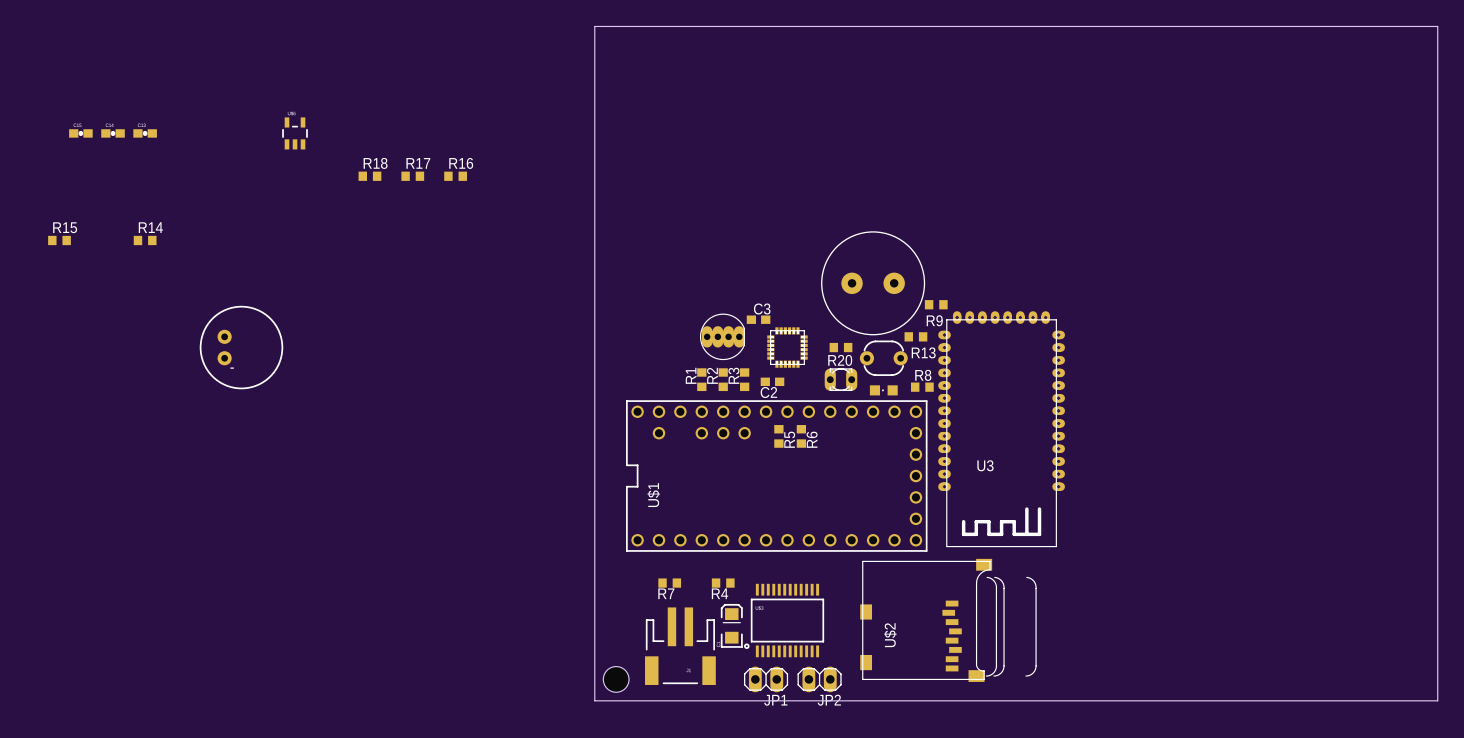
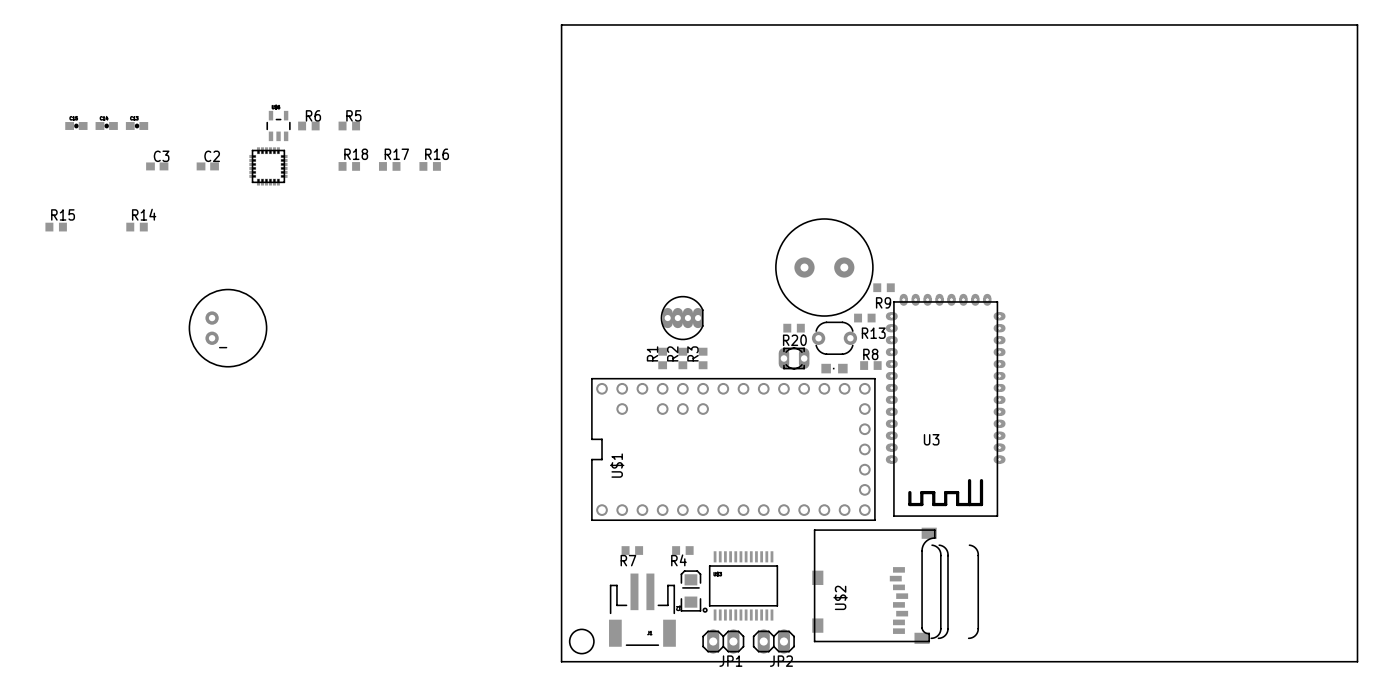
part: none -> (268, 166)
C3 position: (758, 319) -> (157, 166)
part: (787, 347) -> none
C2 position: (772, 381) -> (207, 166)
C2 name position: C2 (768, 392) -> C2 (212, 156)
R5 rotation: 0° (778, 436) -> 90° clockwise (349, 125)
R5 position: (778, 436) -> (349, 125)
R6 rotation: 0° (801, 436) -> 90° clockwise (308, 125)
R6 position: (801, 436) -> (308, 125)
R5 name position: R5 (789, 439) -> R5 (353, 115)
R6 name position: R6 (812, 439) -> R6 (313, 115)

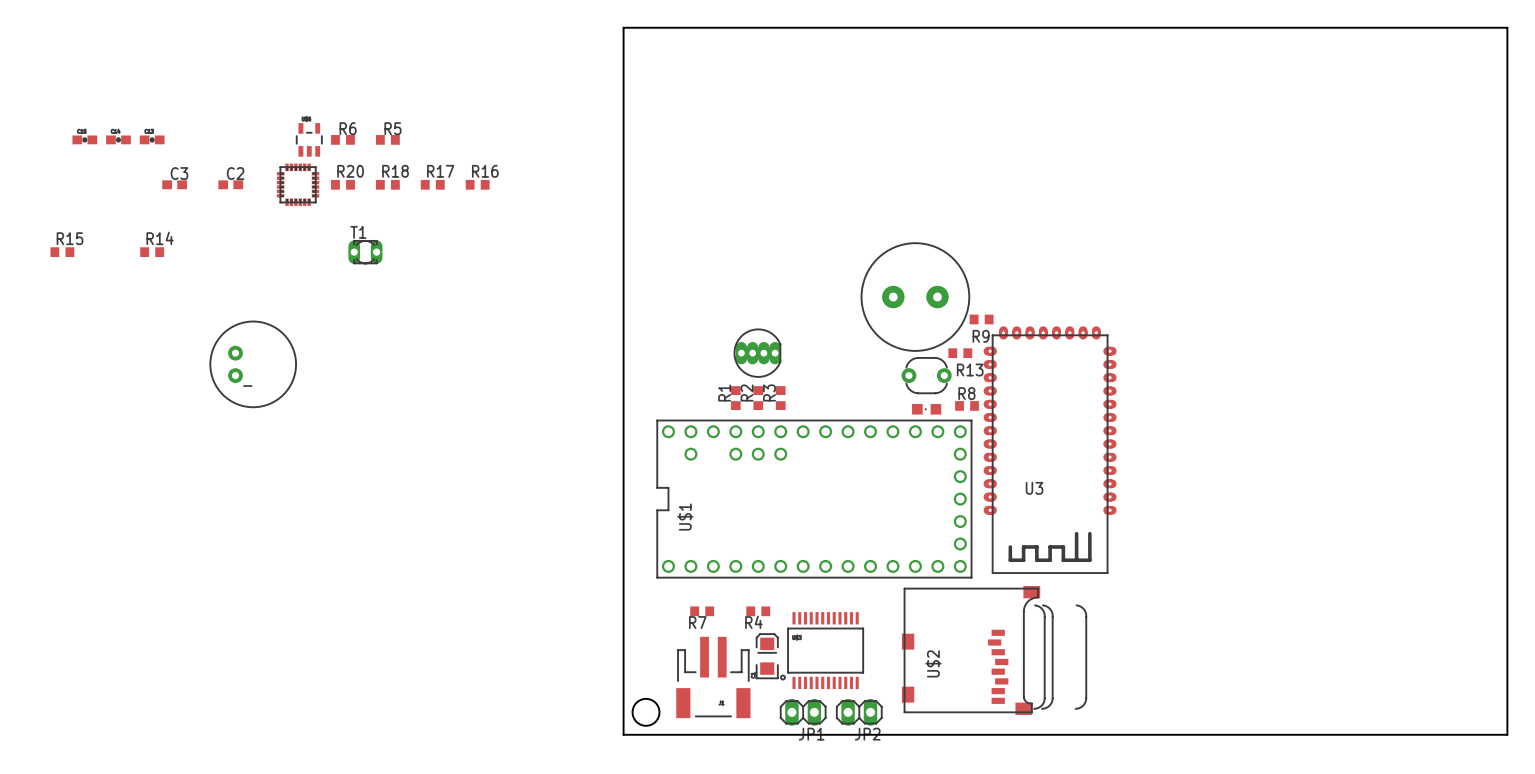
T1: none -> (365, 252)
R20 position: (794, 328) -> (342, 184)
R20 name position: R20 (794, 340) -> R20 (350, 171)
part: (794, 358) -> none

